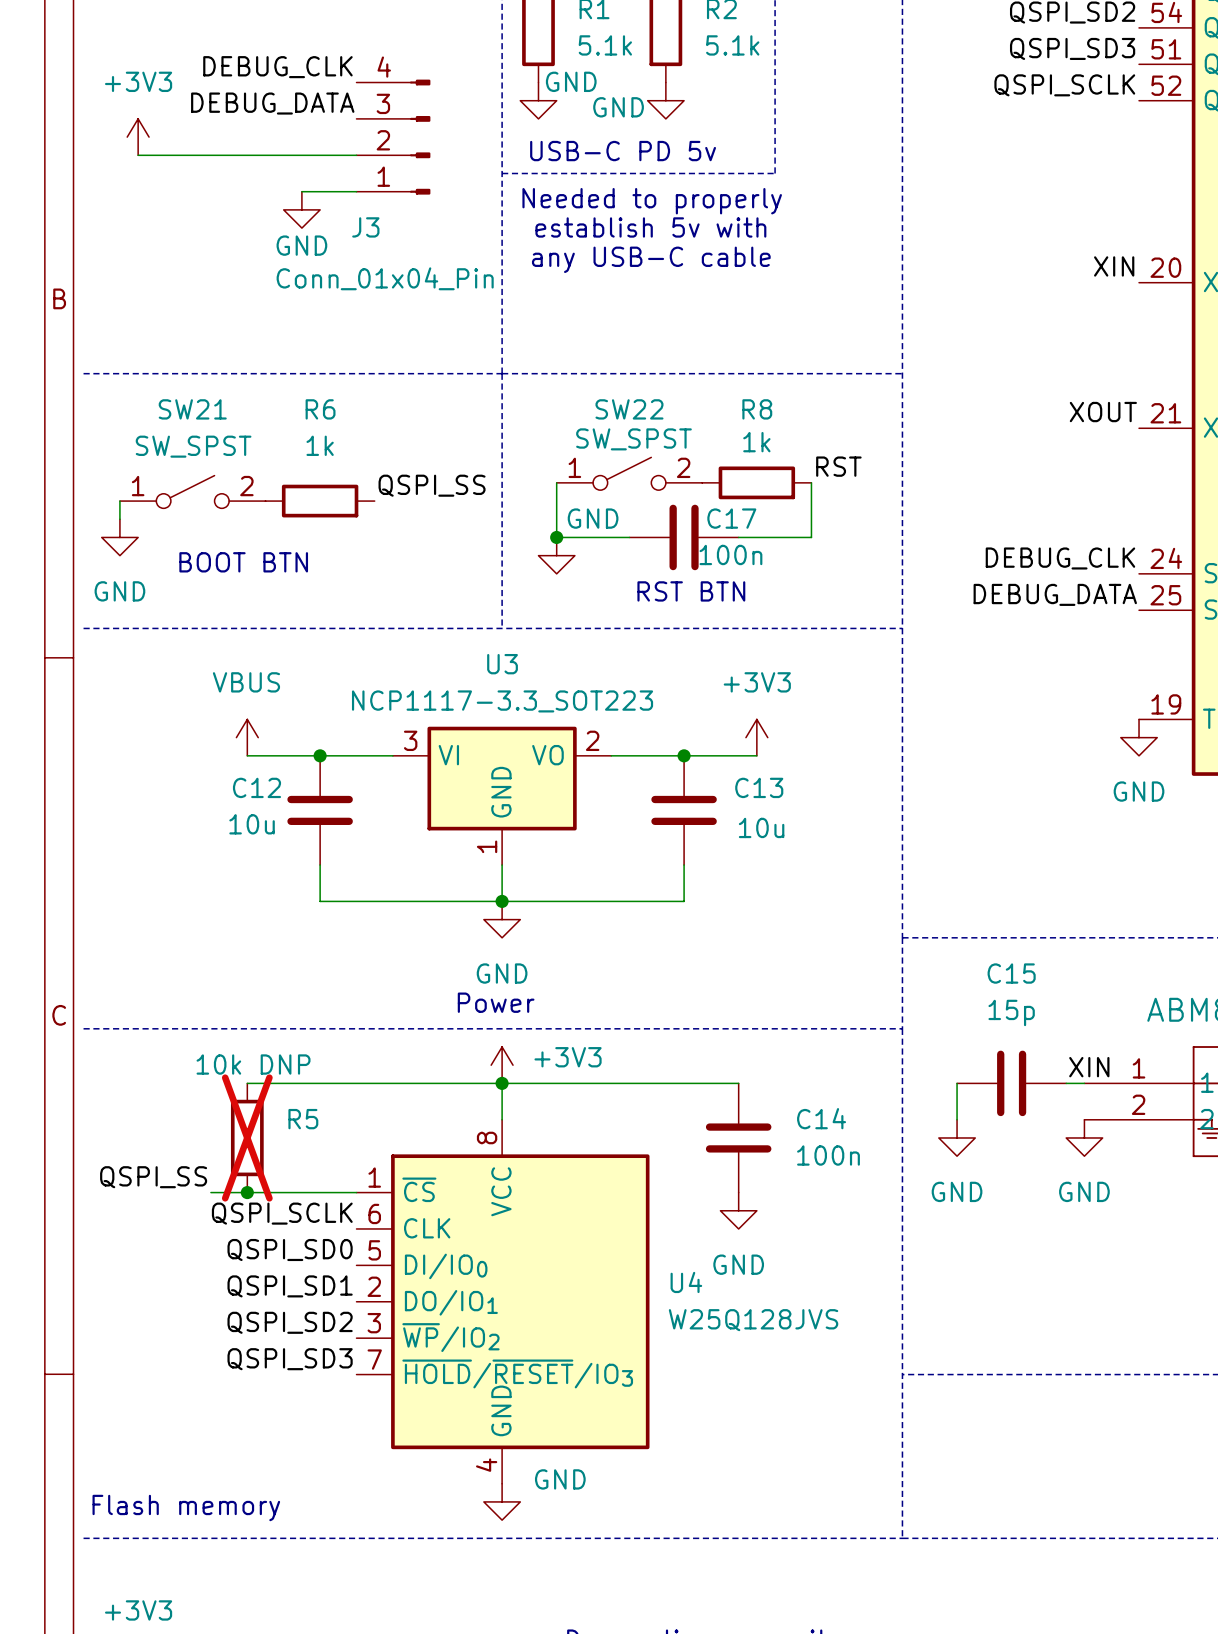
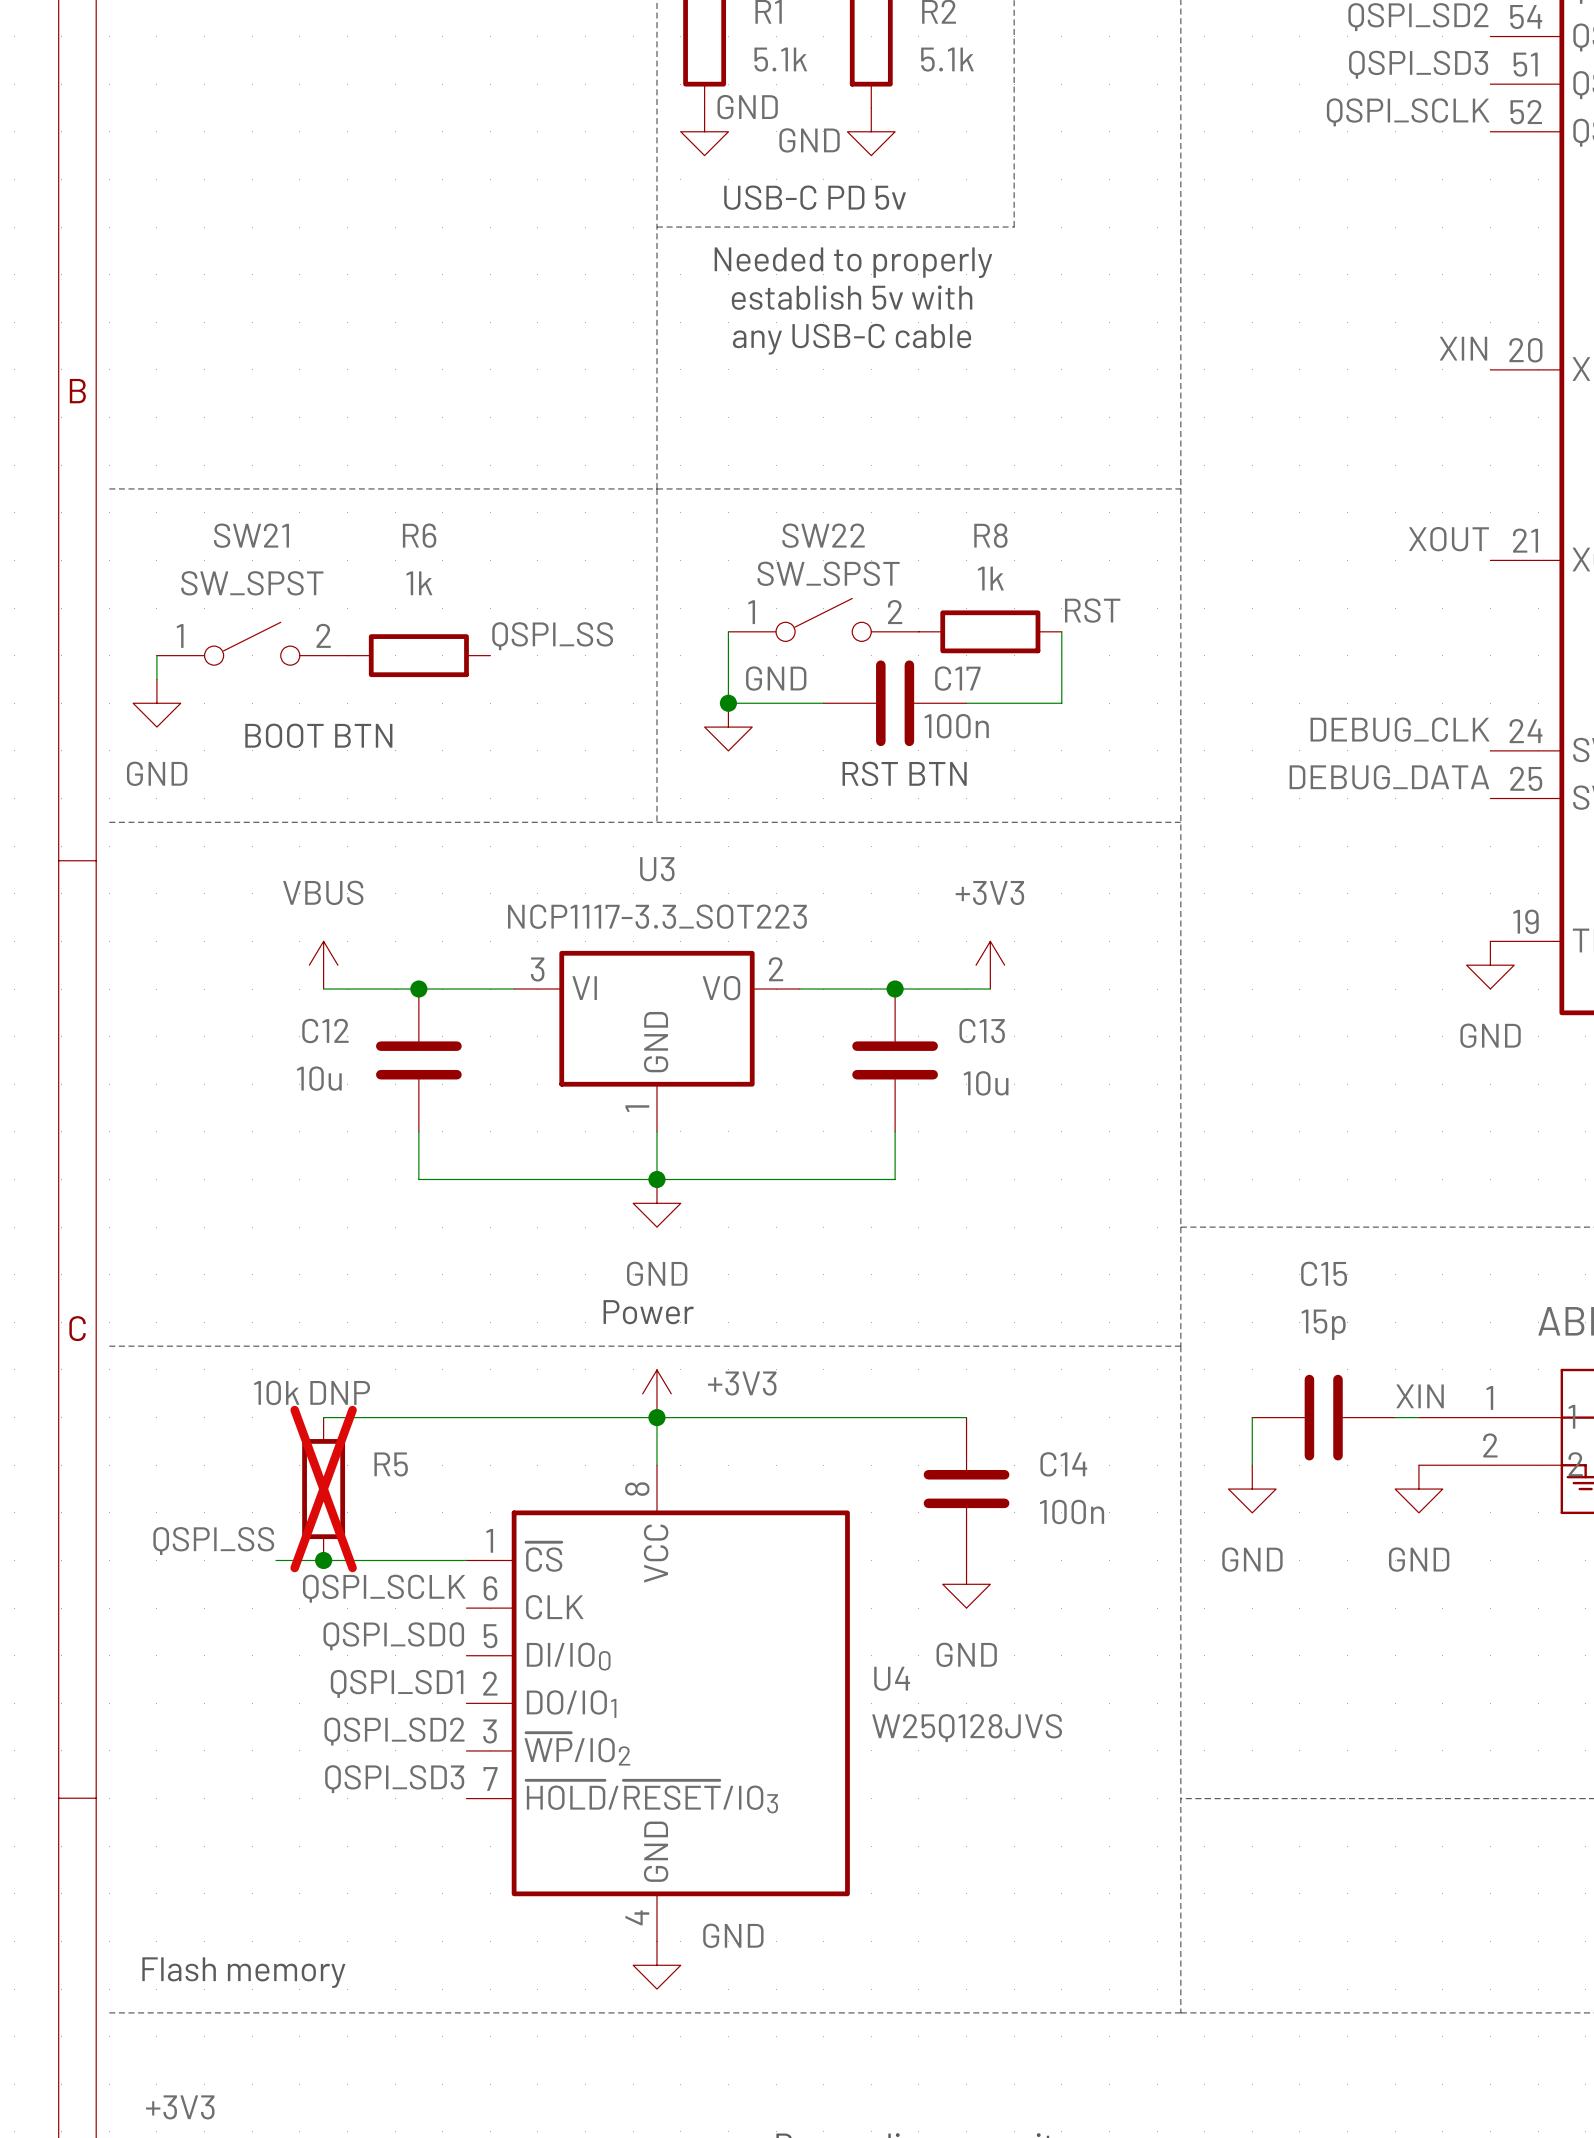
label: DEBUG_CLK (277, 67) -> none
label: DEBUG_DATA (272, 103) -> none
power symbol: +3V3 (138, 137) -> none
J3: Conn_01x04_Pin (393, 137) -> none
wire: (138, 155) (356, 155) -> none
wire: (301, 191) (356, 191) -> none
power symbol: GND (301, 209) -> none

